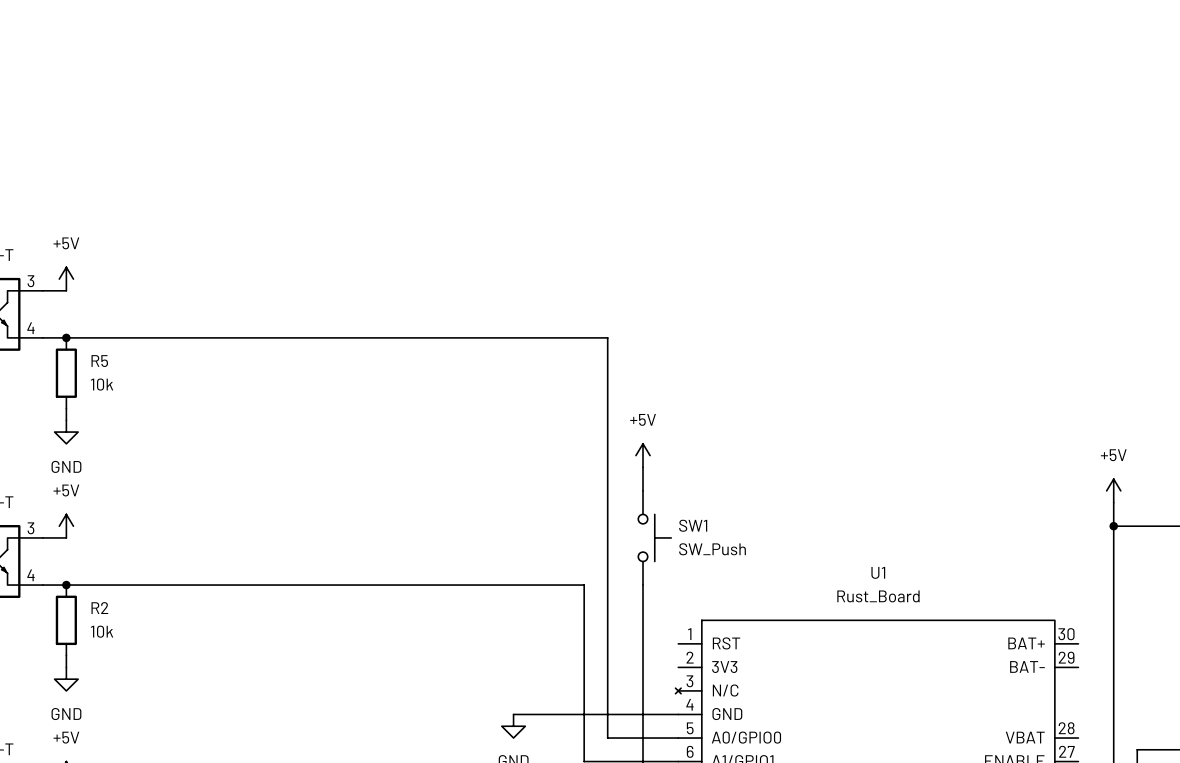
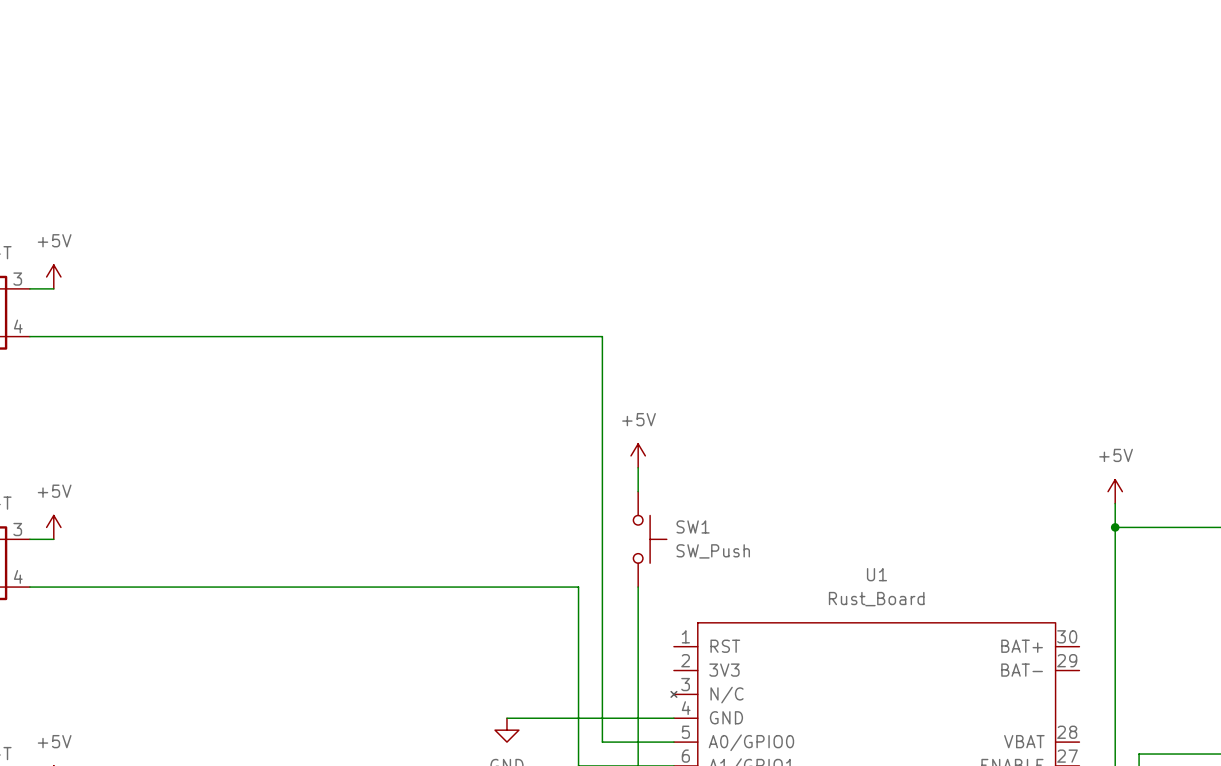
junction: (66, 337) -> none
R5: 10k (66, 373) -> none
wire: (66, 408) (66, 420) -> none
power symbol: GND (66, 432) -> none
junction: (66, 585) -> none
R2: 10k (66, 620) -> none
wire: (66, 655) (66, 667) -> none
power symbol: GND (66, 679) -> none

